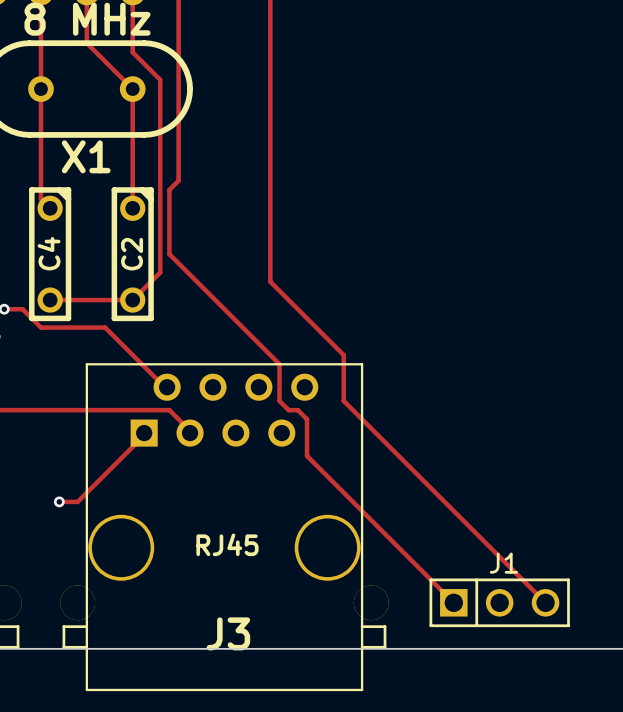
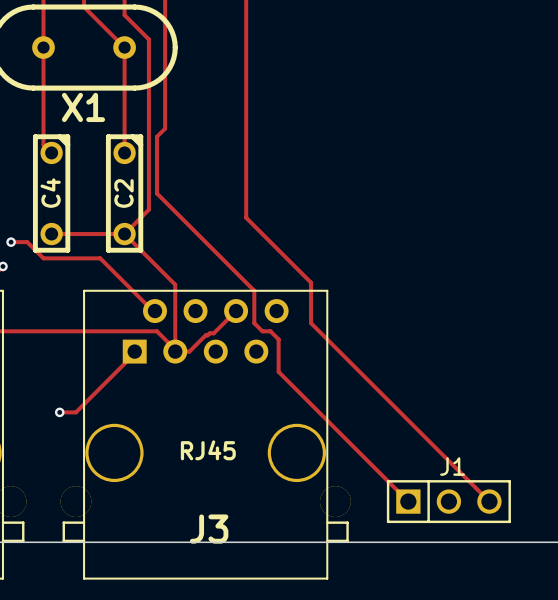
track: none -> (124, 234) (175, 284) (175, 351) (189, 351) (205, 335) (213, 333) (236, 311)

